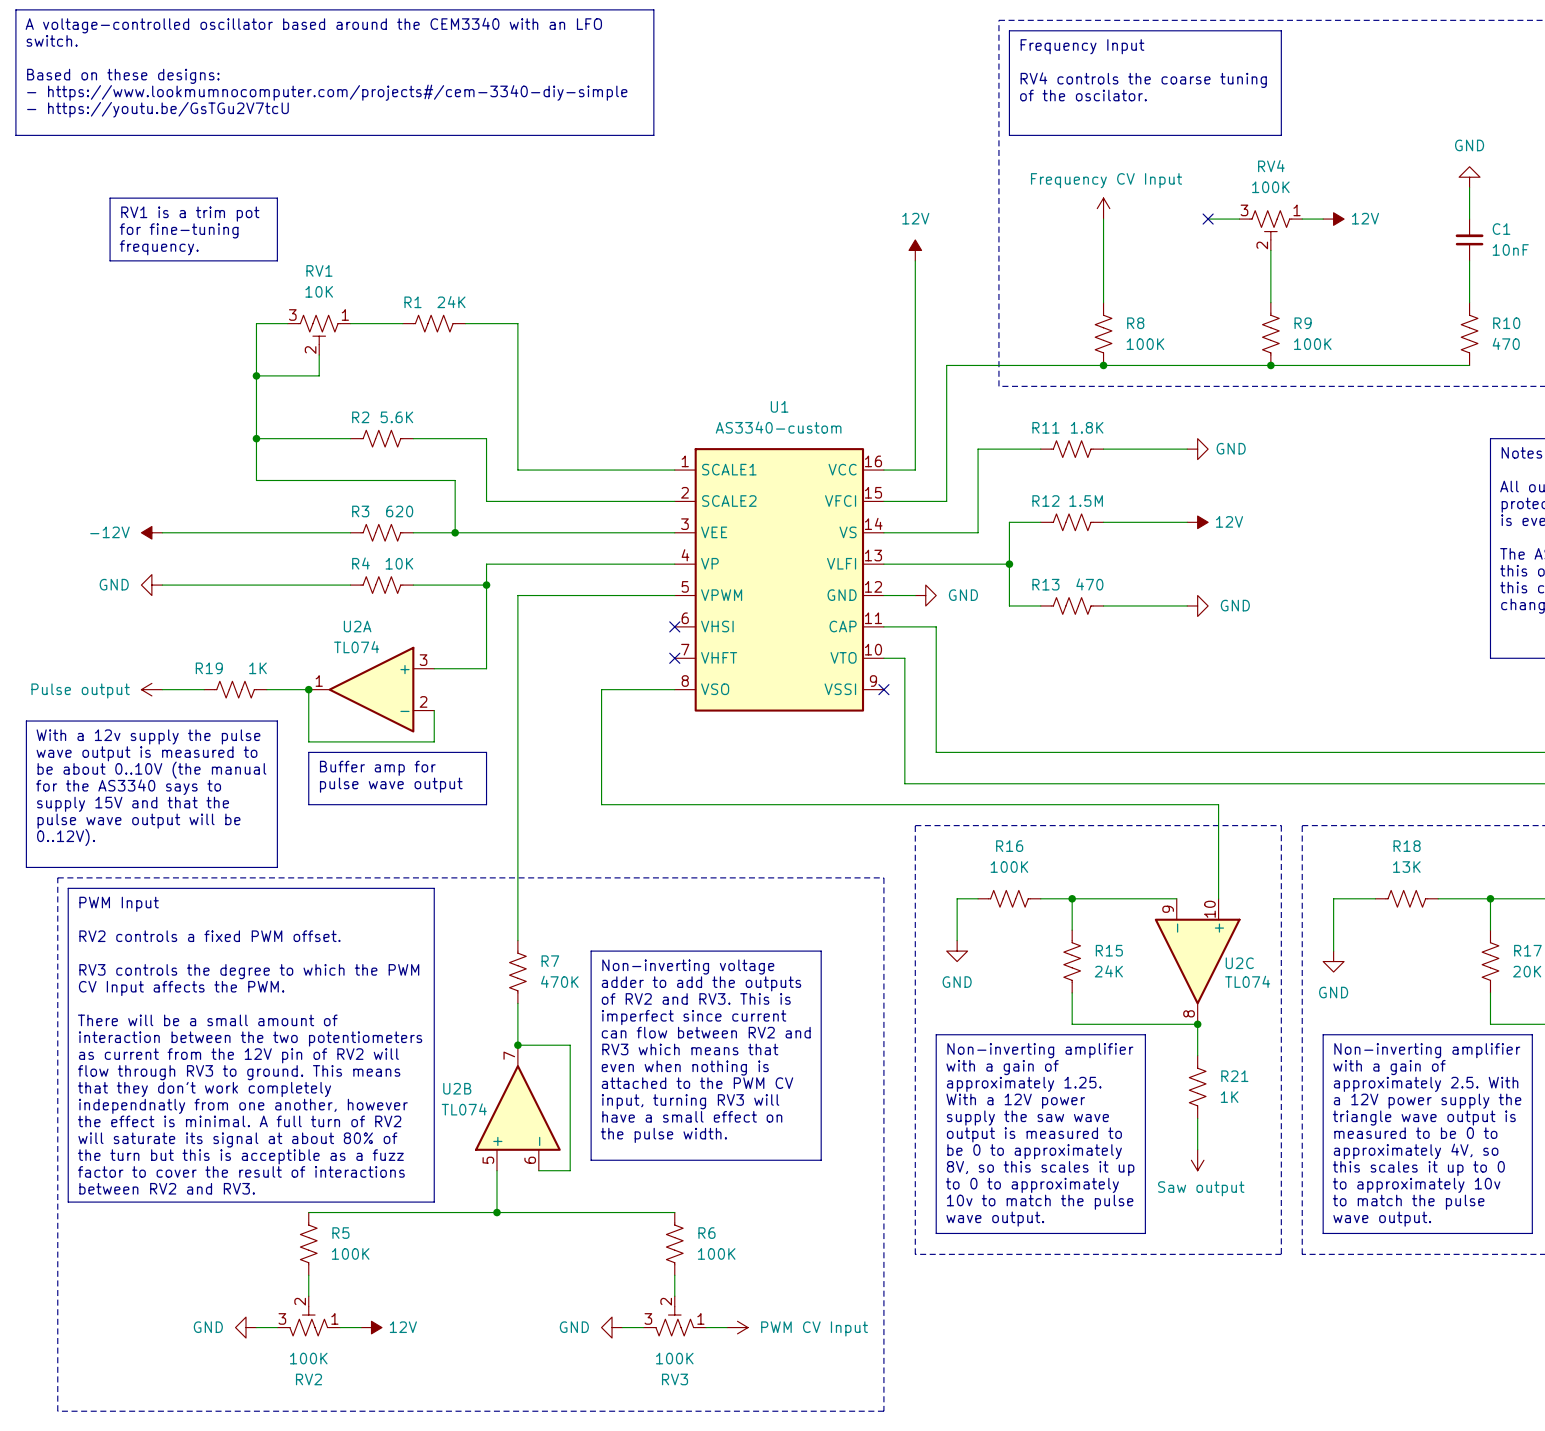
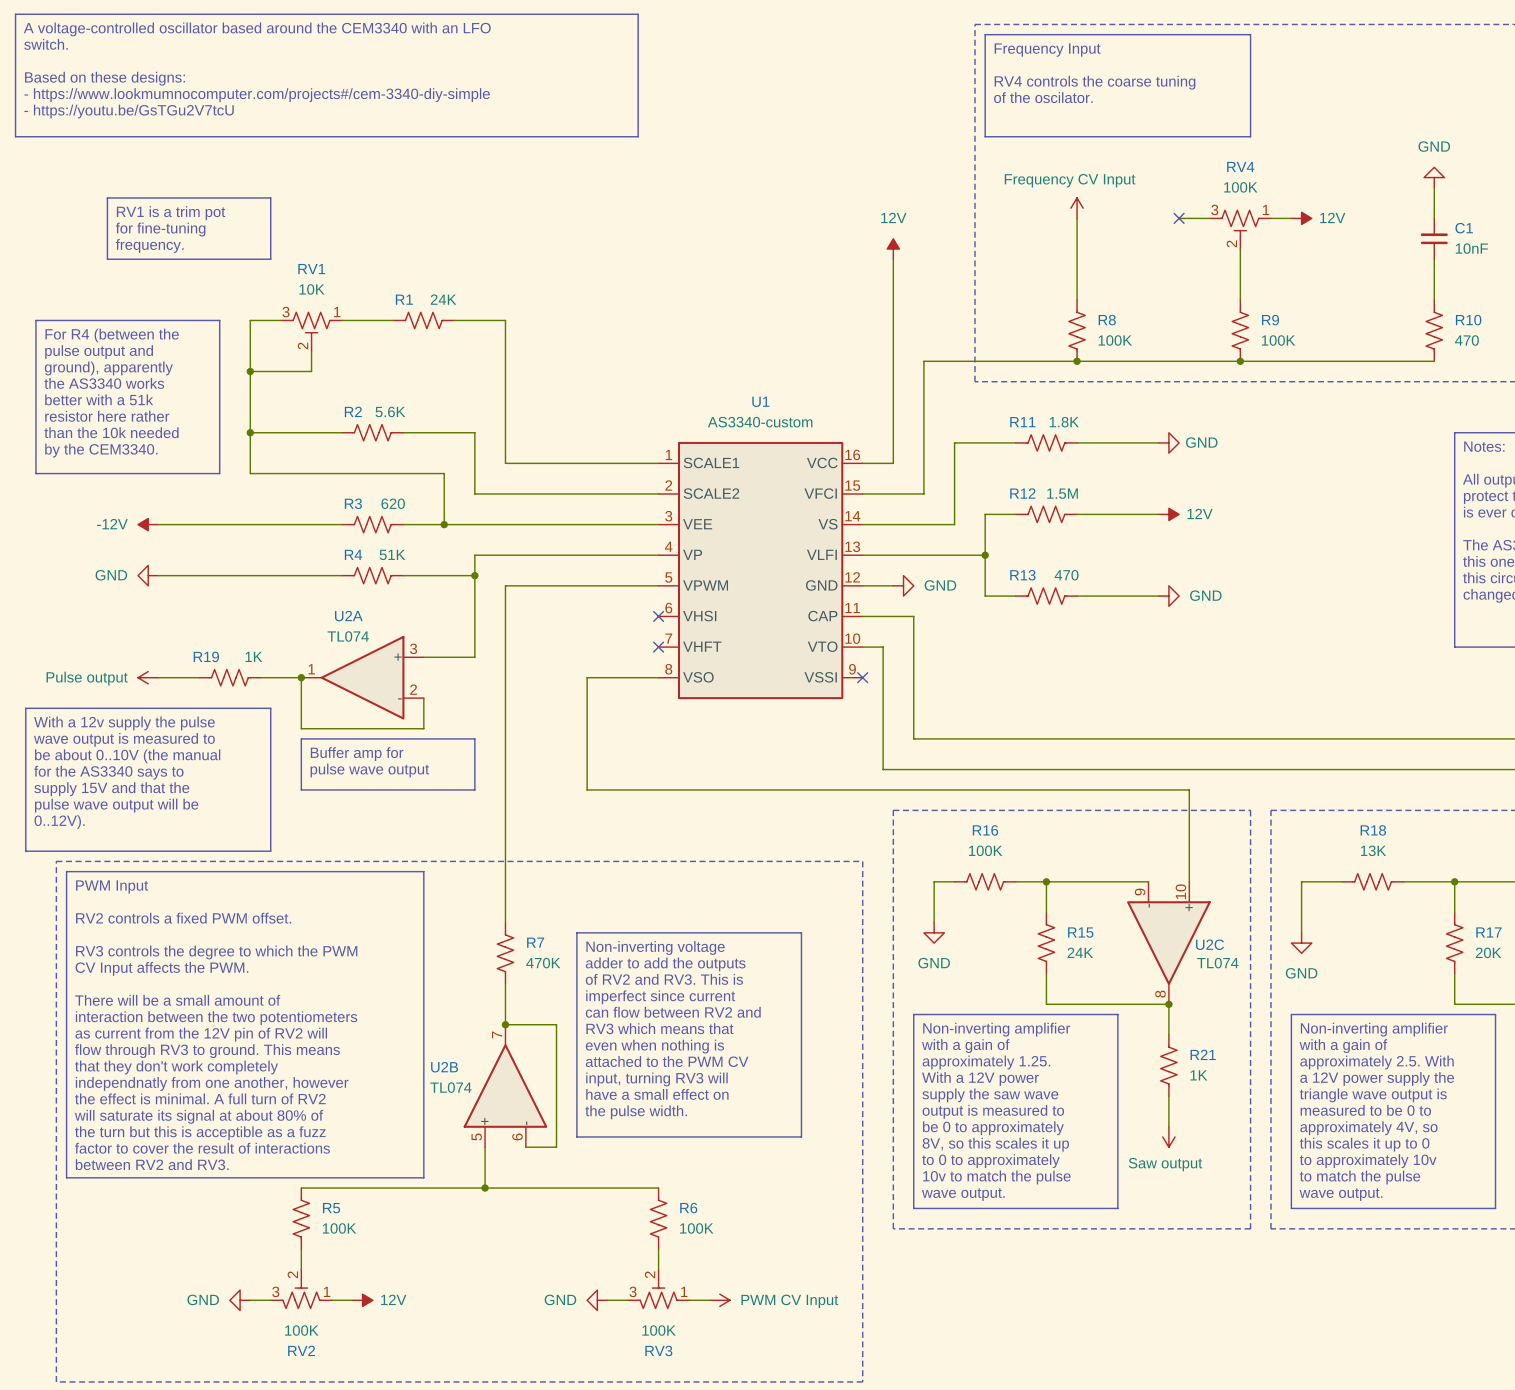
line: none -> (35, 320) (219, 320) (219, 473) (35, 473) (35, 320)
text: none -> For R4 (between the (112, 335)
text: none -> pulse output and (99, 352)
text: none -> ground), apparently (108, 368)
text: none -> the AS3340 works (104, 383)
text: none -> better with a 51k (99, 399)
text: none -> resistor here rather (107, 416)
text: none -> than the 10k needed (111, 432)
text: none -> by the CEM3340. (101, 450)
R4 value: 10K (399, 563) -> 51K (392, 554)

